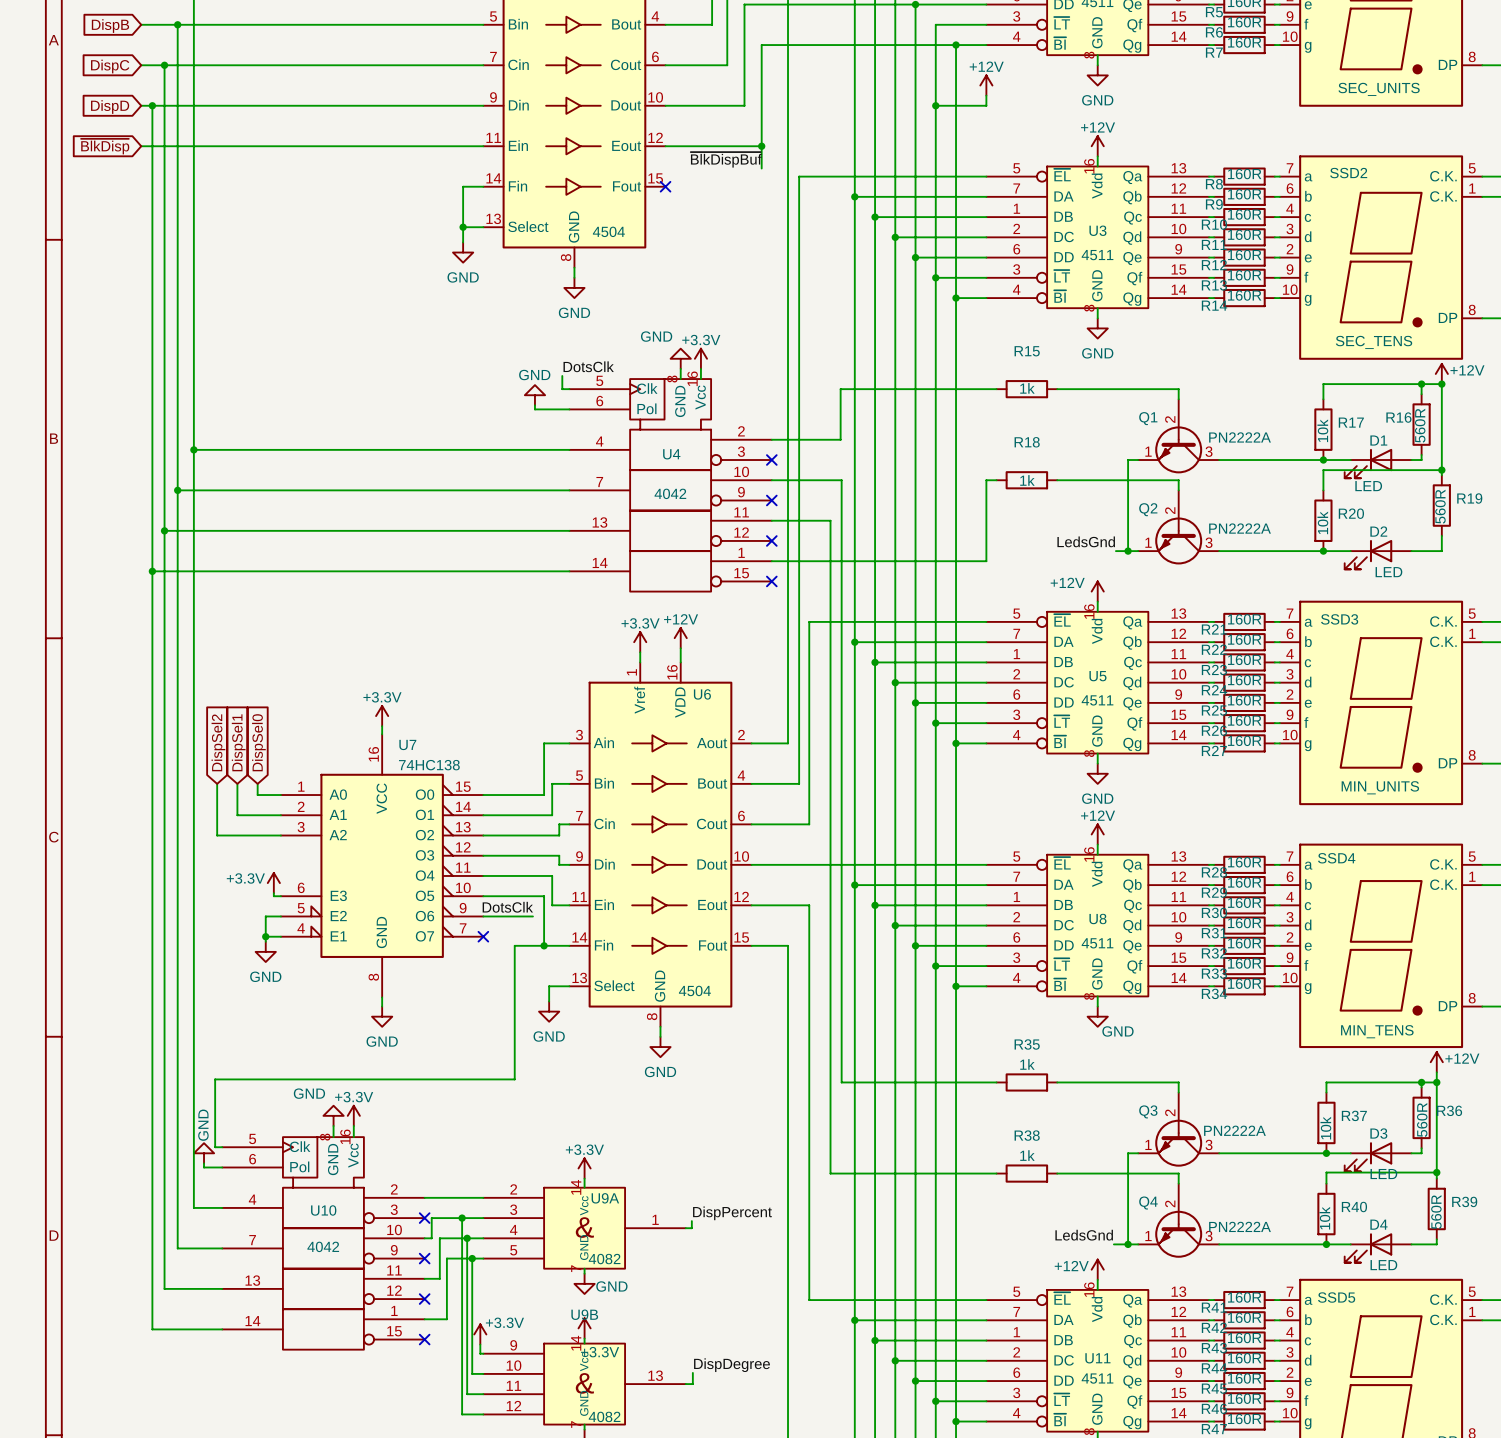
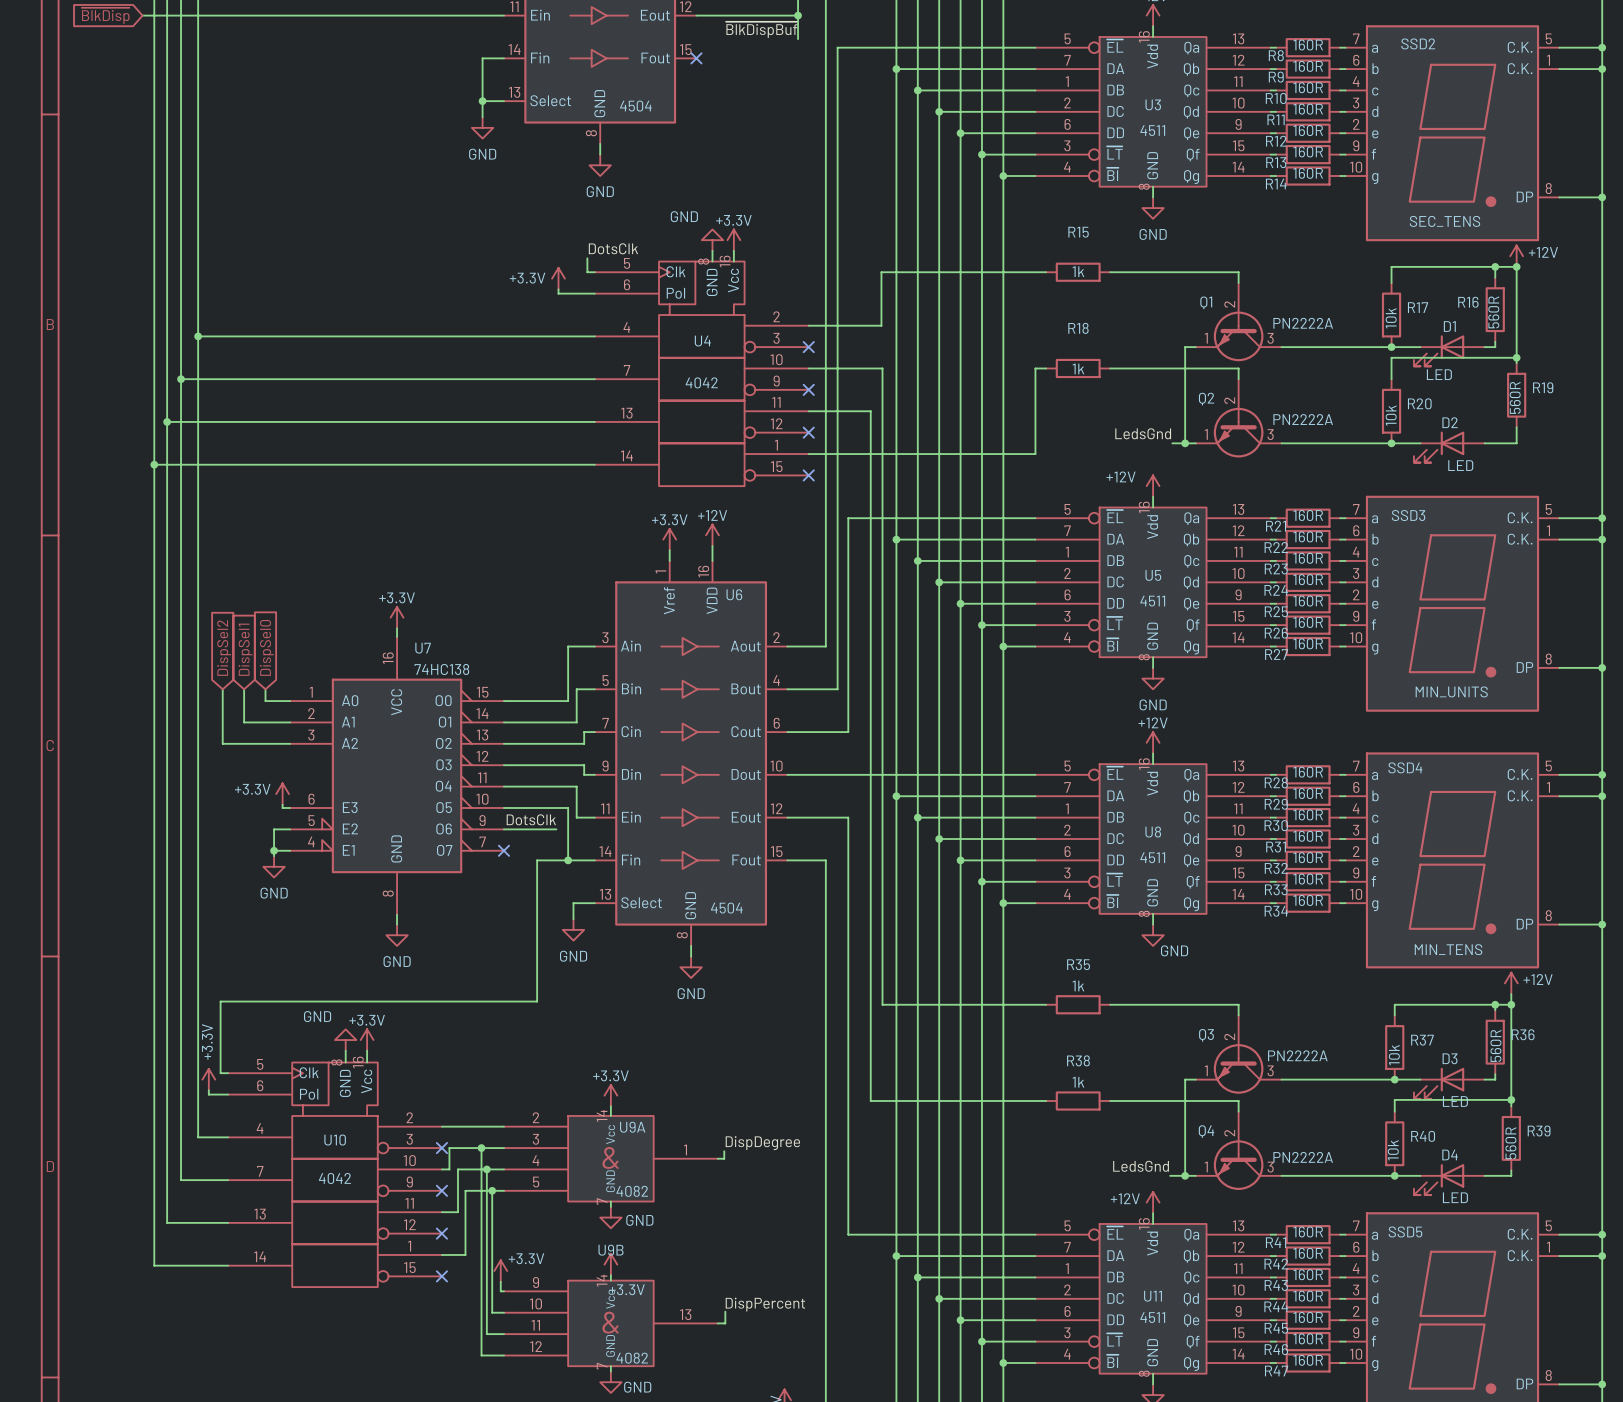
power symbol: GND (534, 395) -> +3.3V (558, 278)
power symbol: GND (204, 1153) -> +3.3V (208, 1079)
label: DispPercent (732, 1213) -> DispDegree (762, 1143)
label: DispDegree (731, 1365) -> DispPercent (765, 1304)

